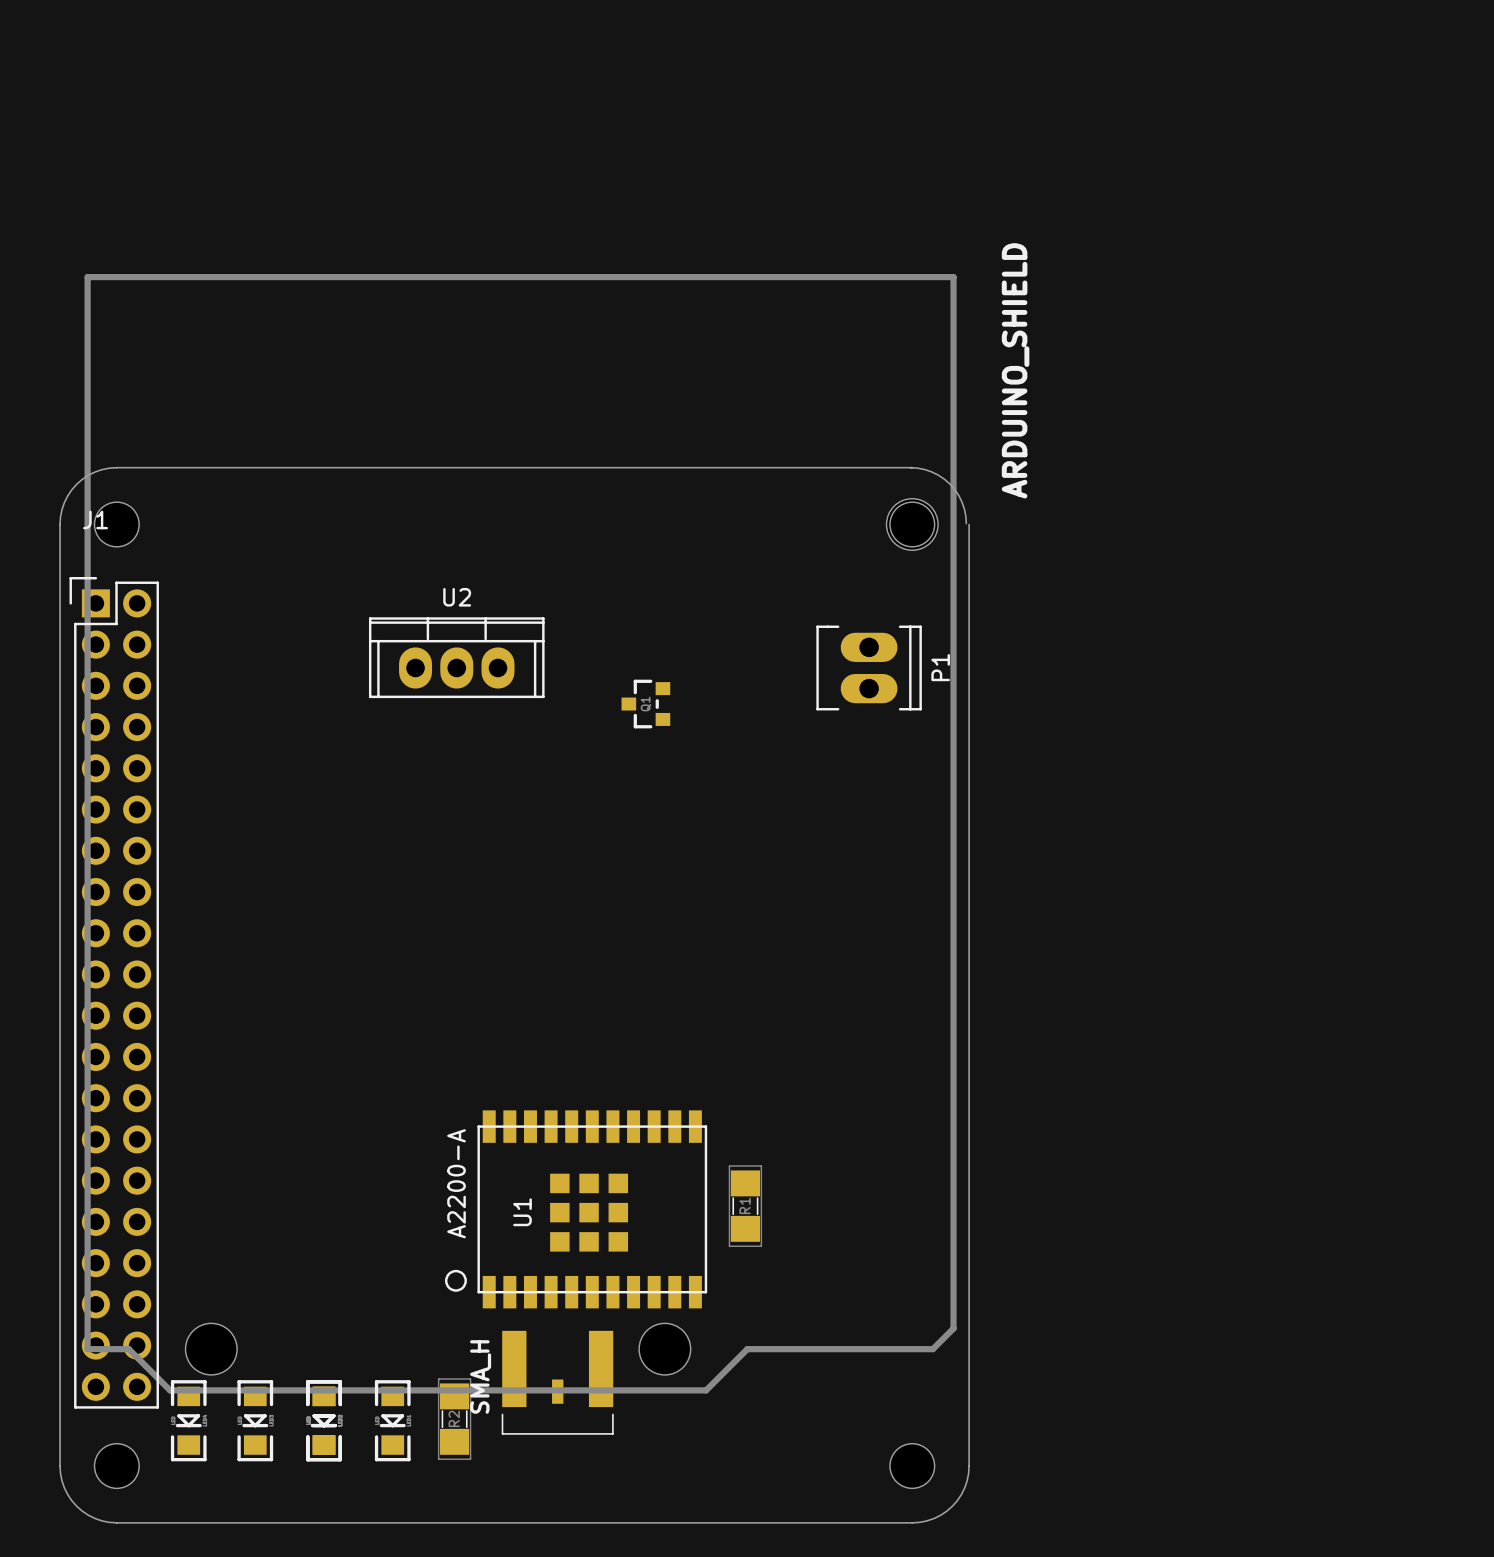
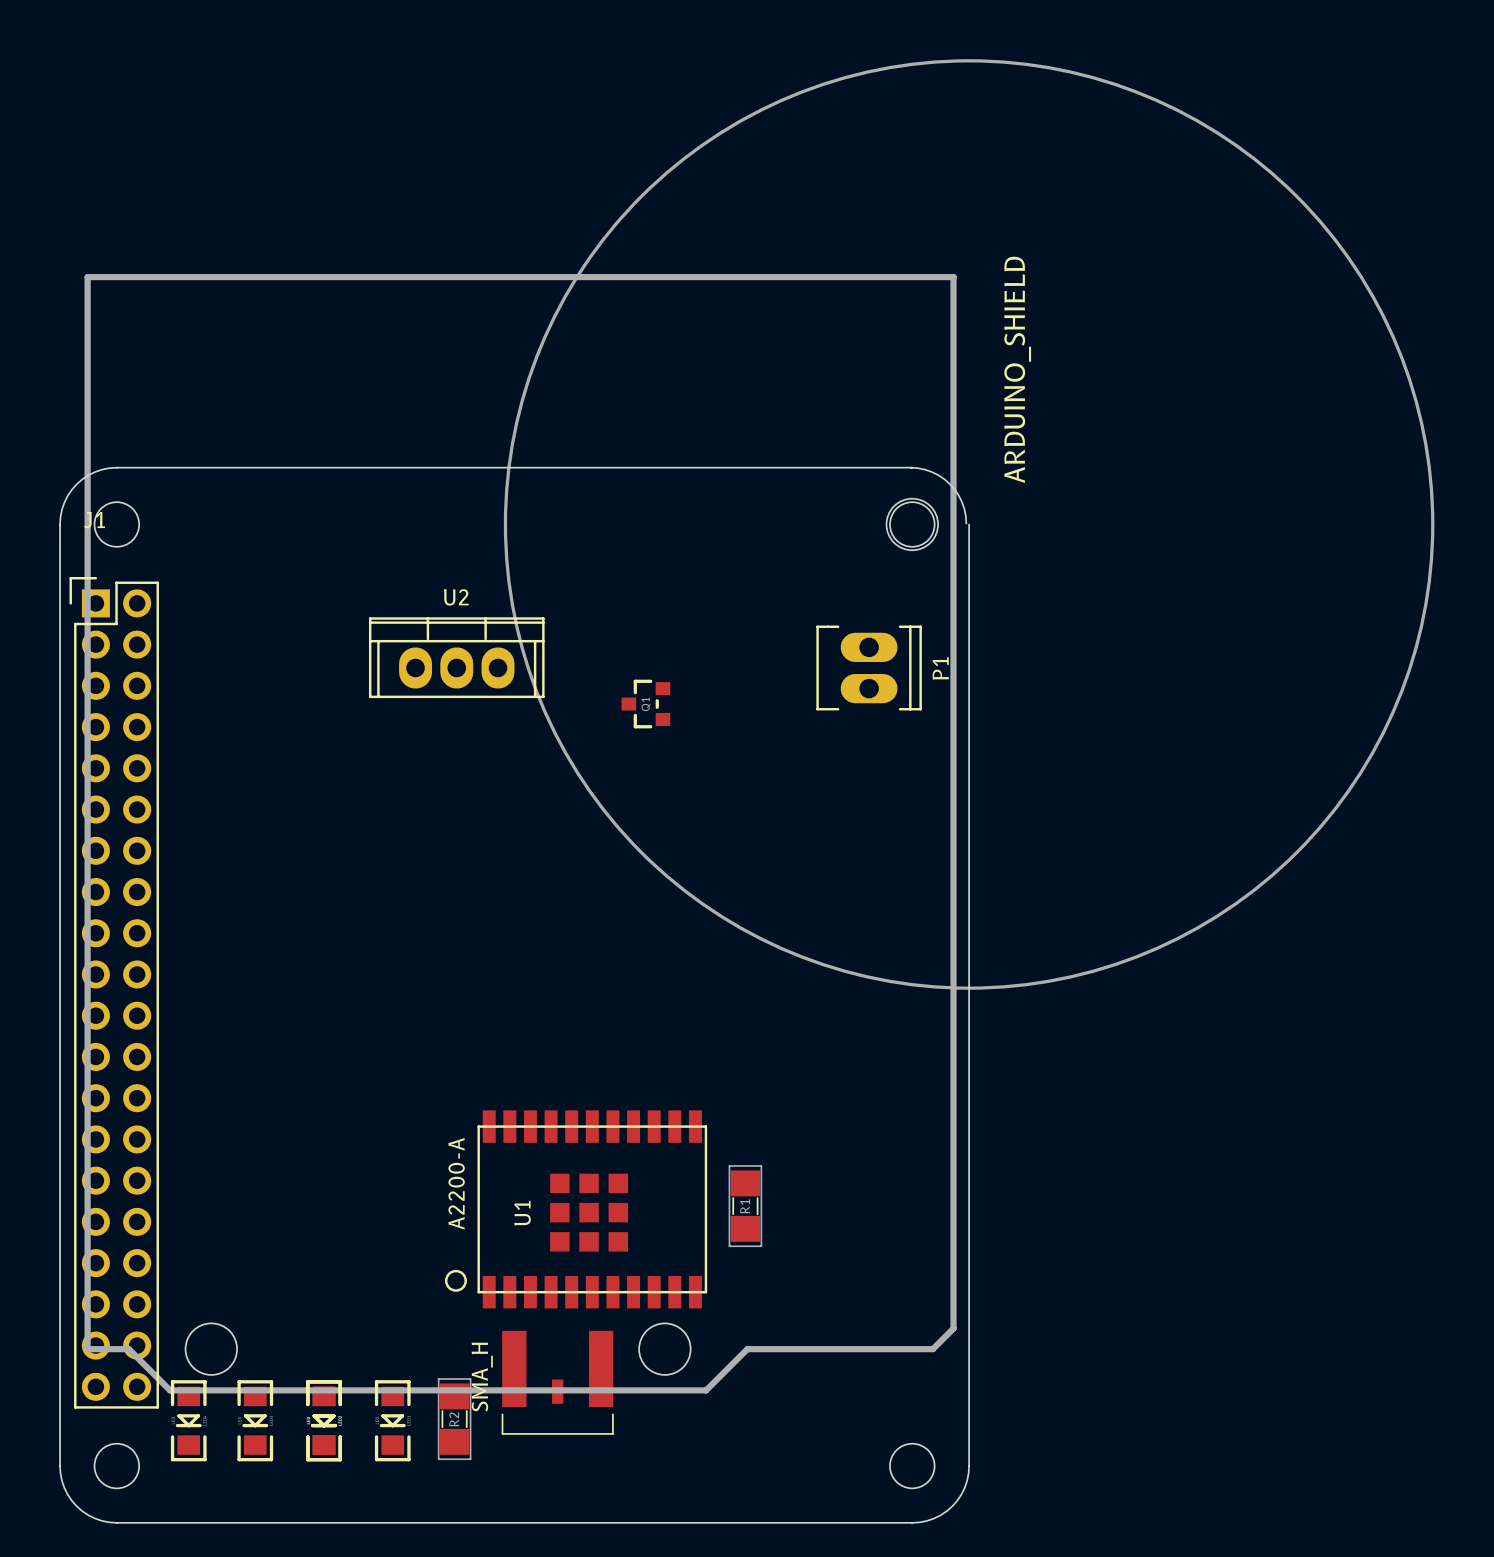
drawing: none -> [503, 59, 1435, 990]

